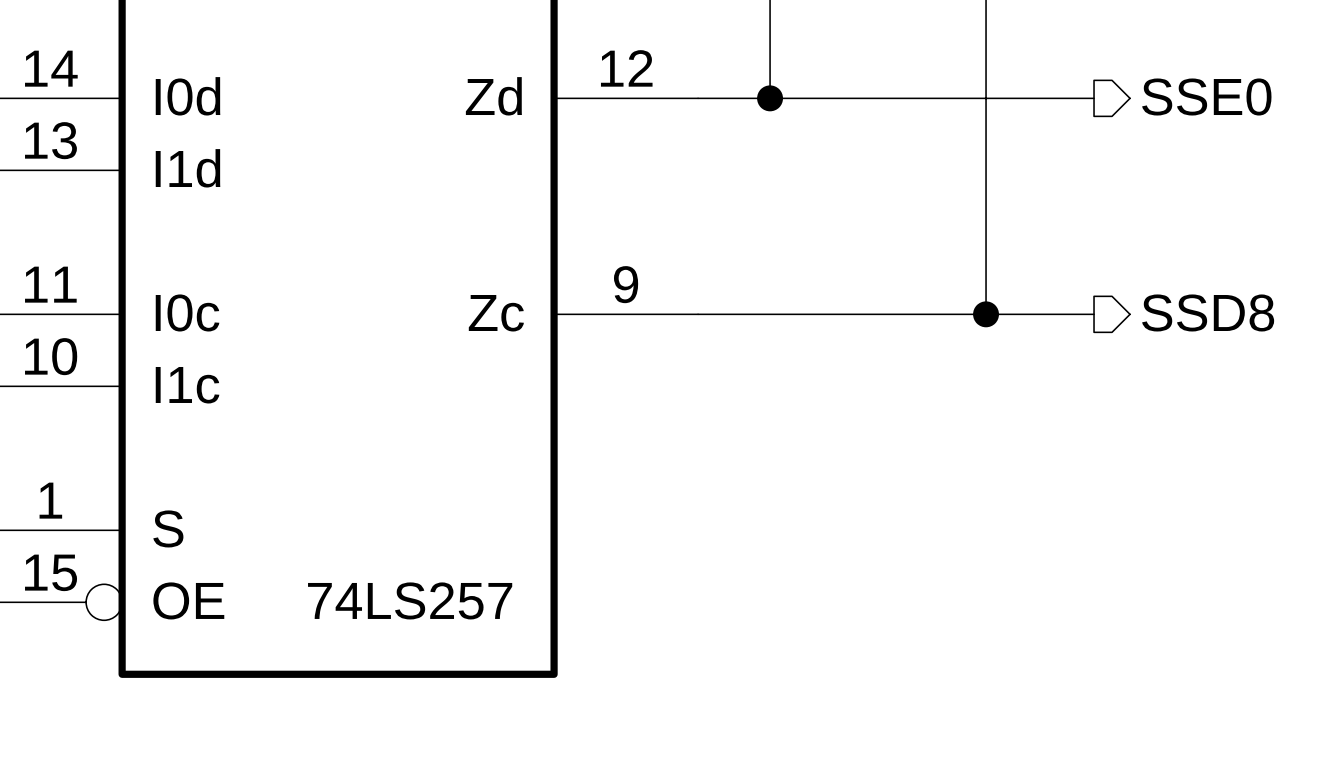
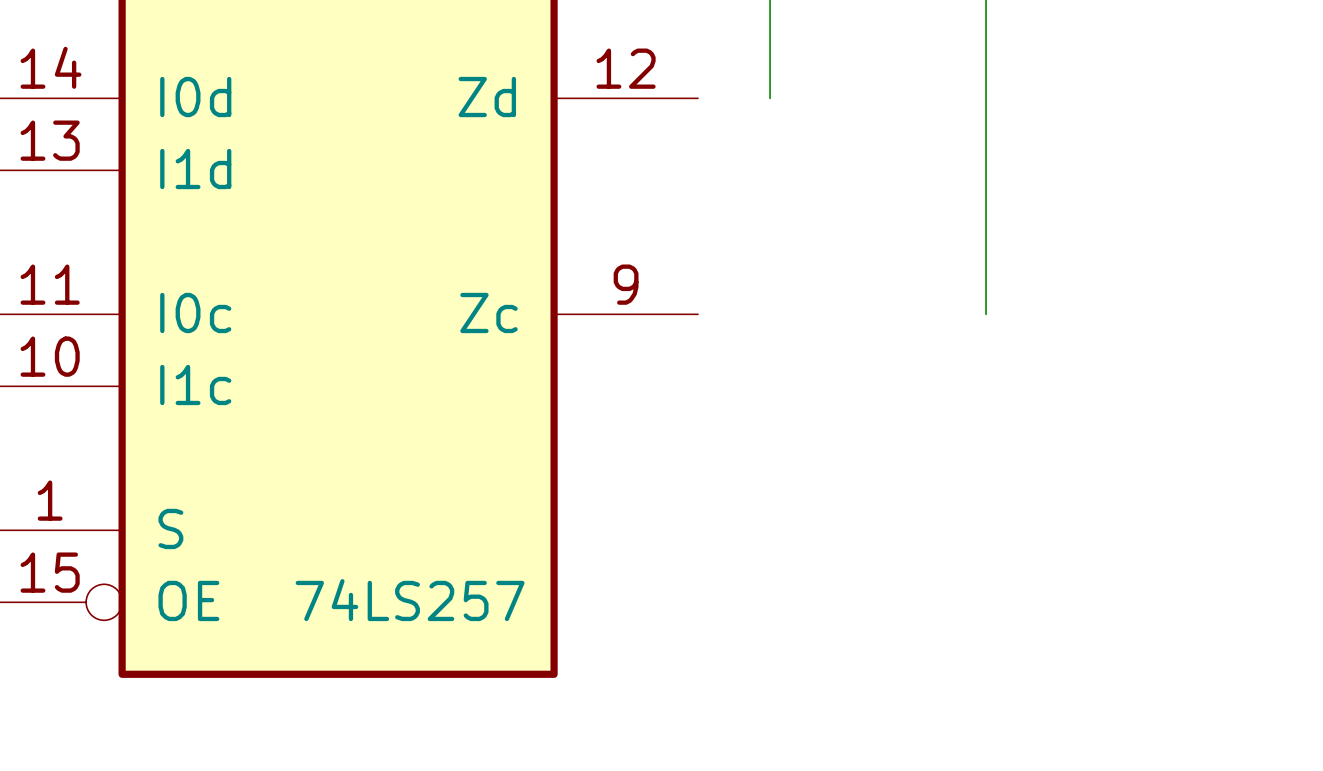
hierarchical label: SSE0 (1206, 97) -> none
wire: (698, 98) (1094, 98) -> none
junction: (770, 98) -> none
hierarchical label: SSD8 (1208, 312) -> none
wire: (698, 314) (1094, 314) -> none
junction: (986, 314) -> none

